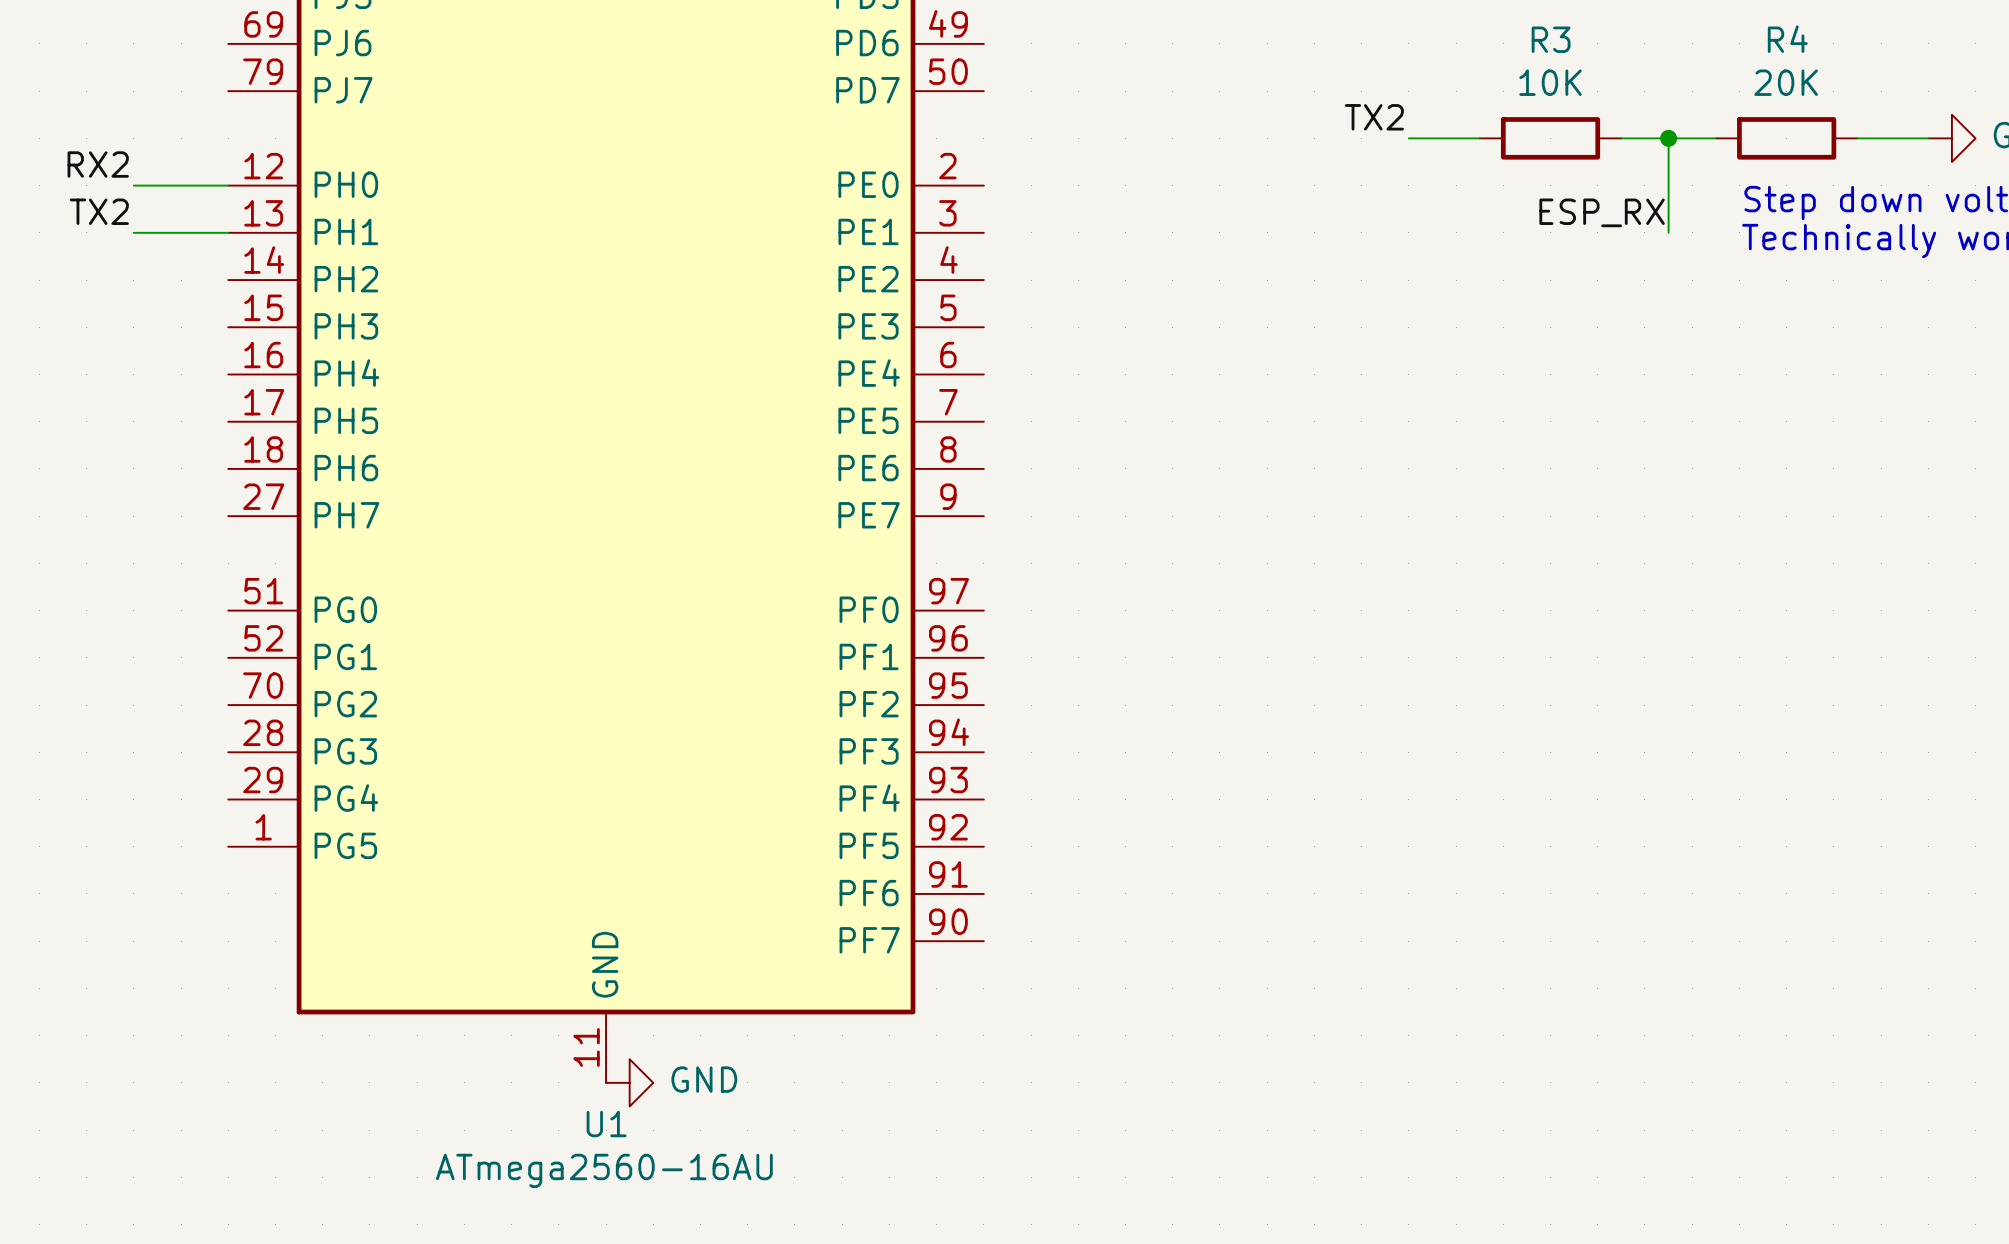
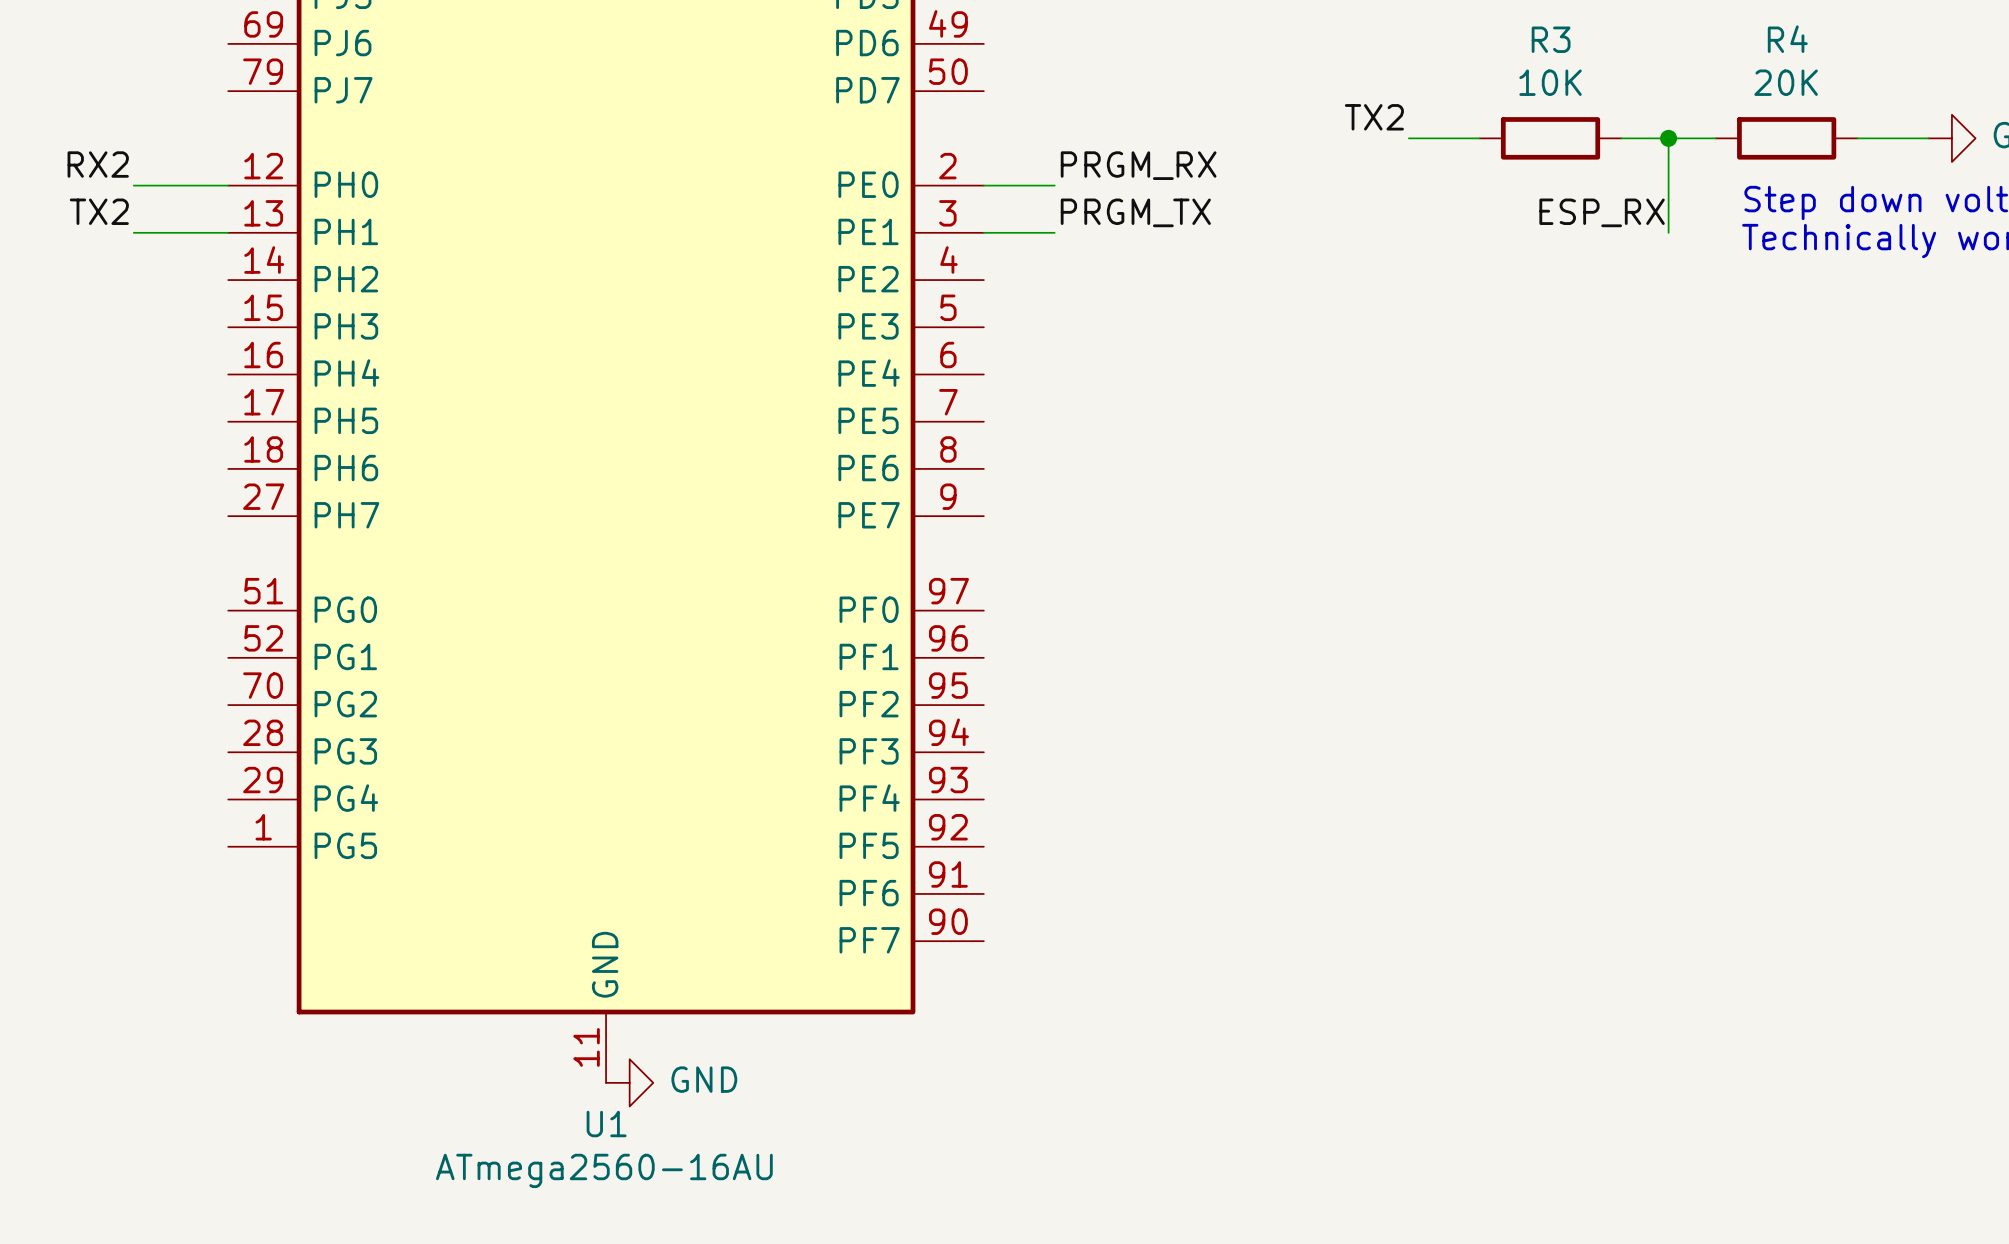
label: none -> PRGM_RX (1138, 165)
wire: none -> (983, 185) (1054, 185)
label: none -> PRGM_TX (1135, 212)
wire: none -> (983, 232) (1054, 232)

